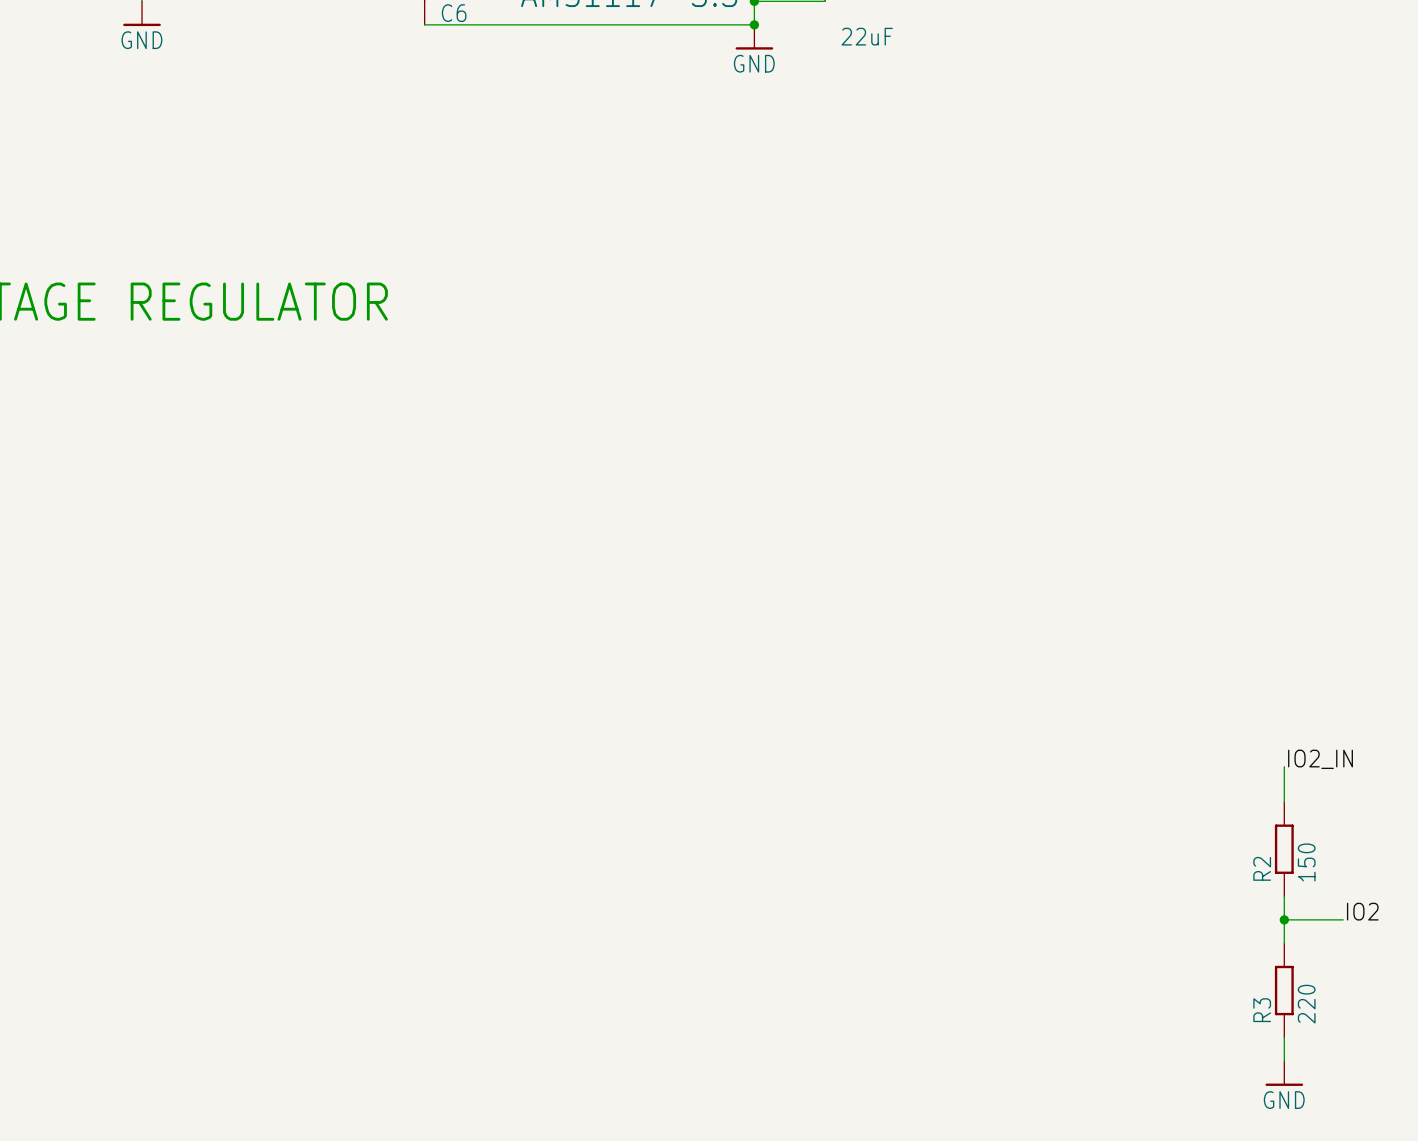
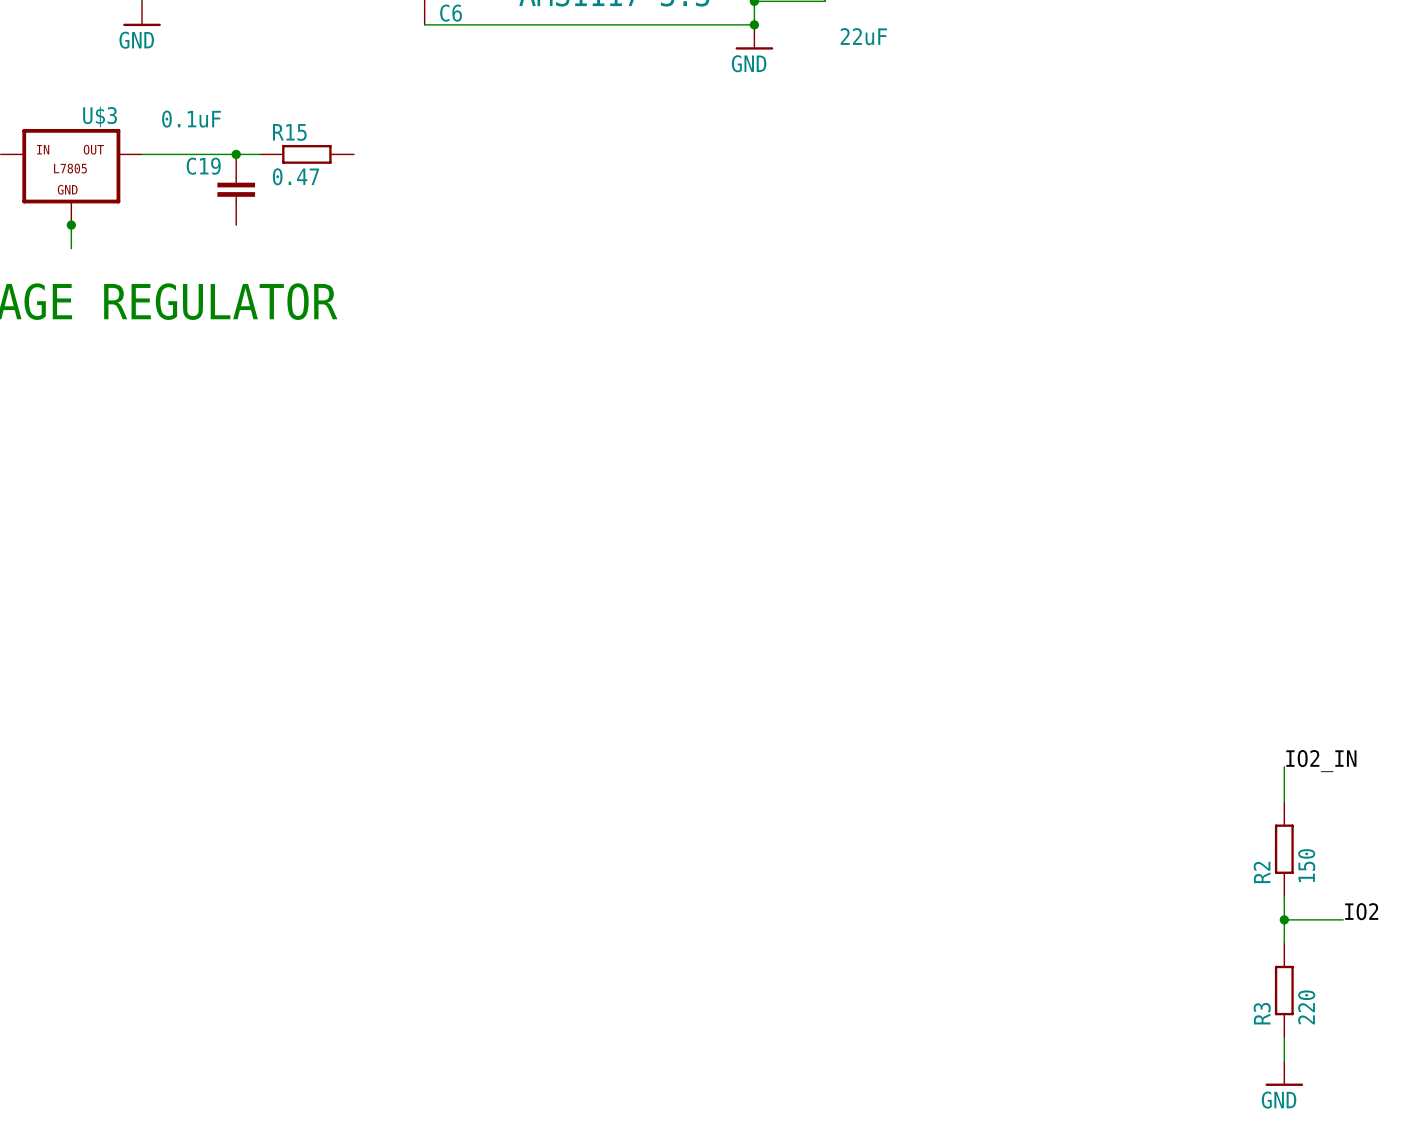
wire: none -> (142, 154) (259, 154)
junction: none -> (236, 154)
R15: none -> 0.47 (306, 154)
U$3: none -> (71, 177)
C19: none -> 0.1uF (236, 189)
wire: none -> (71, 225) (71, 248)
junction: none -> (71, 225)

